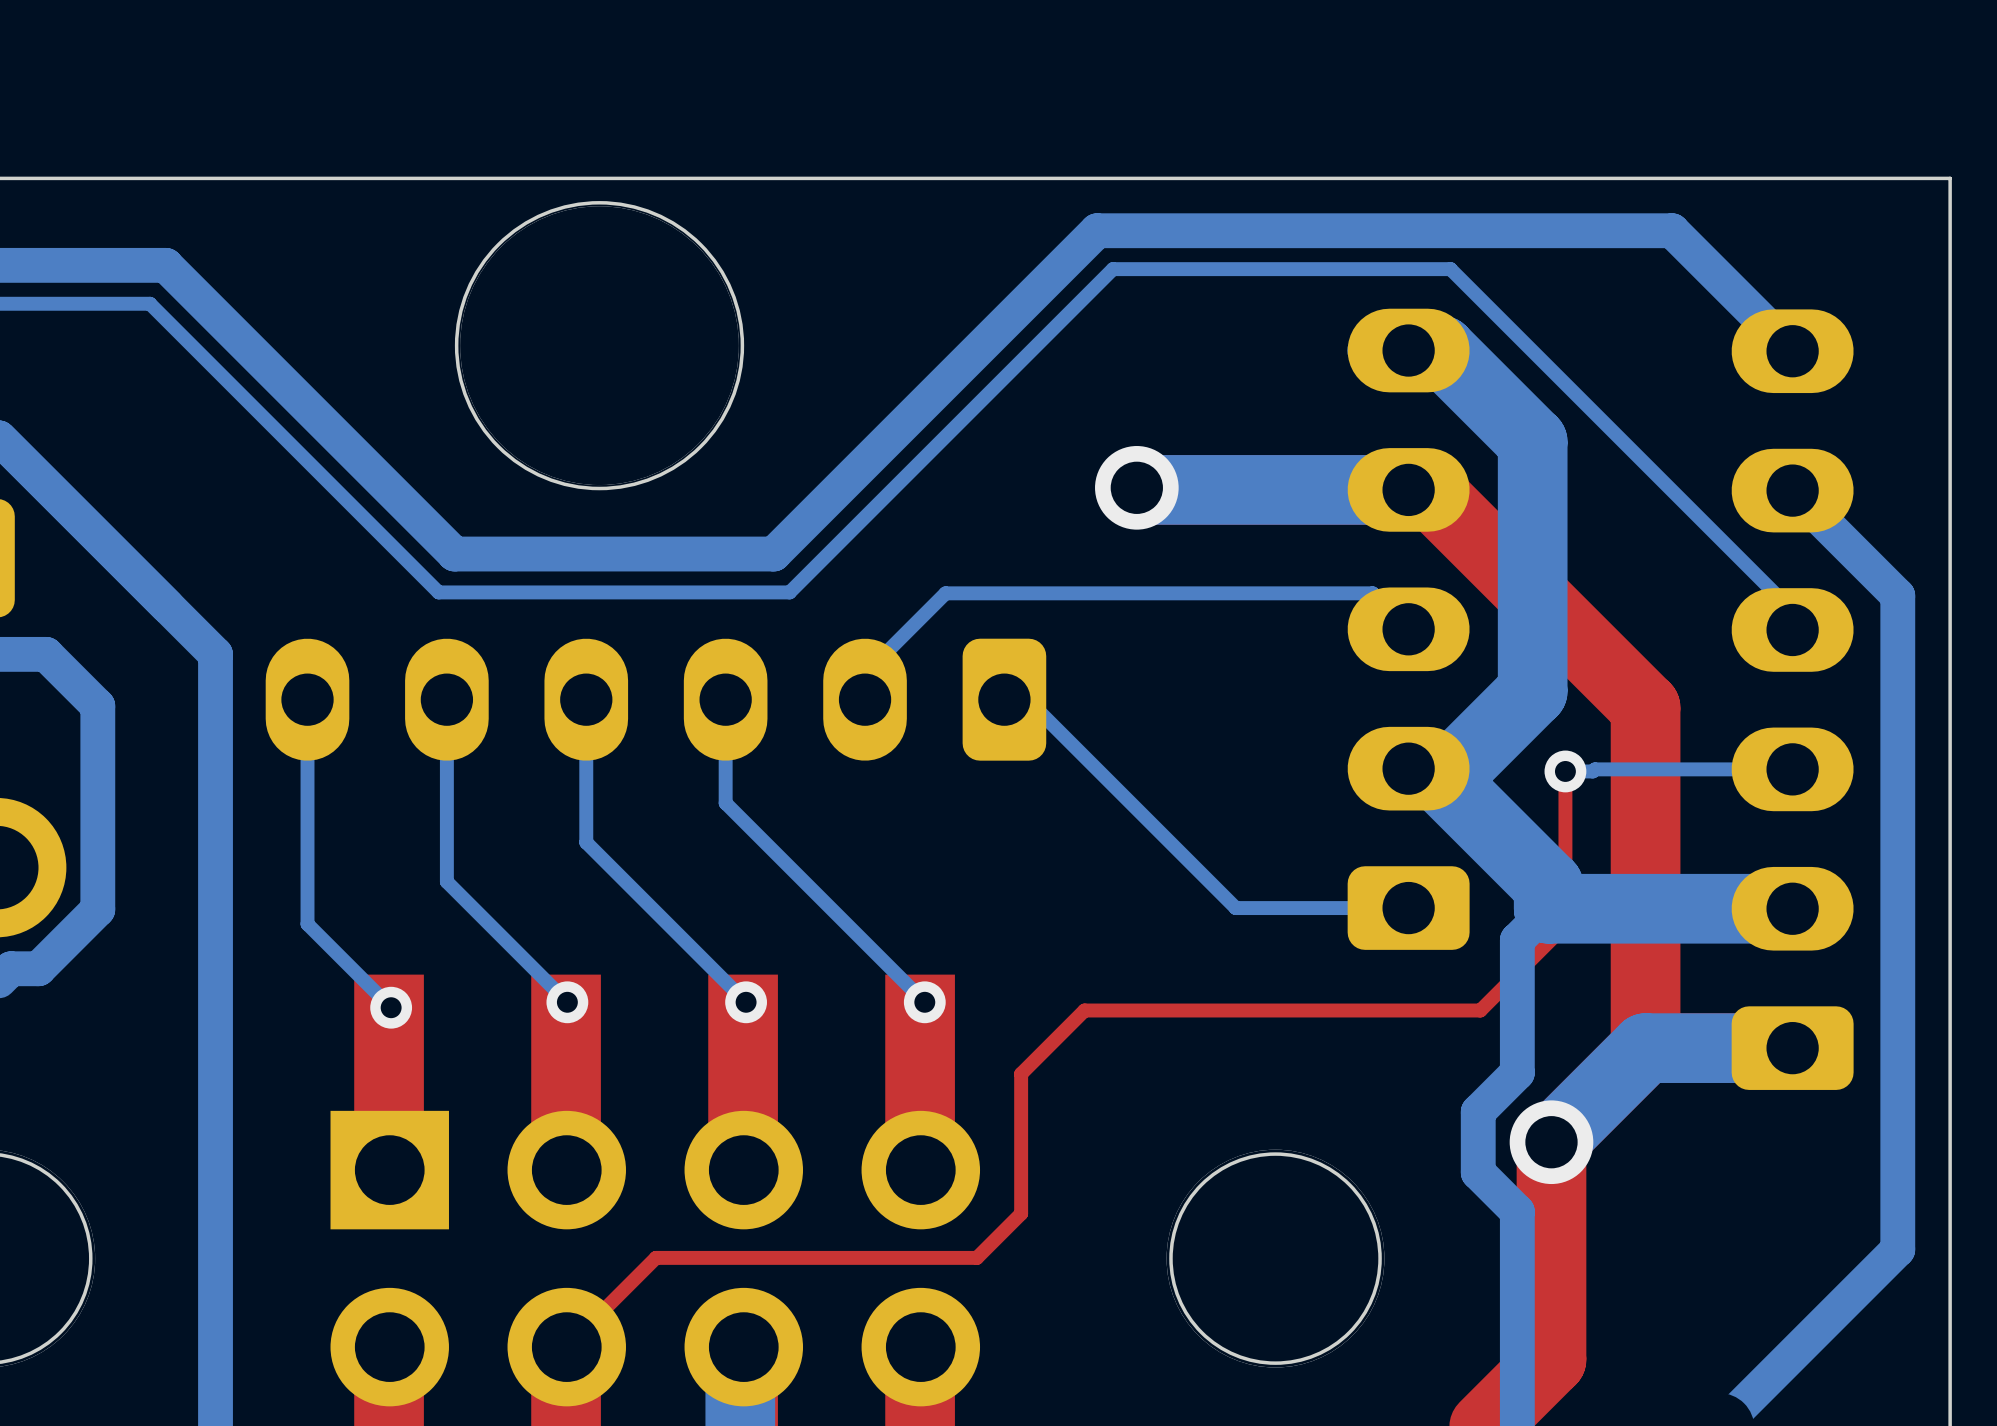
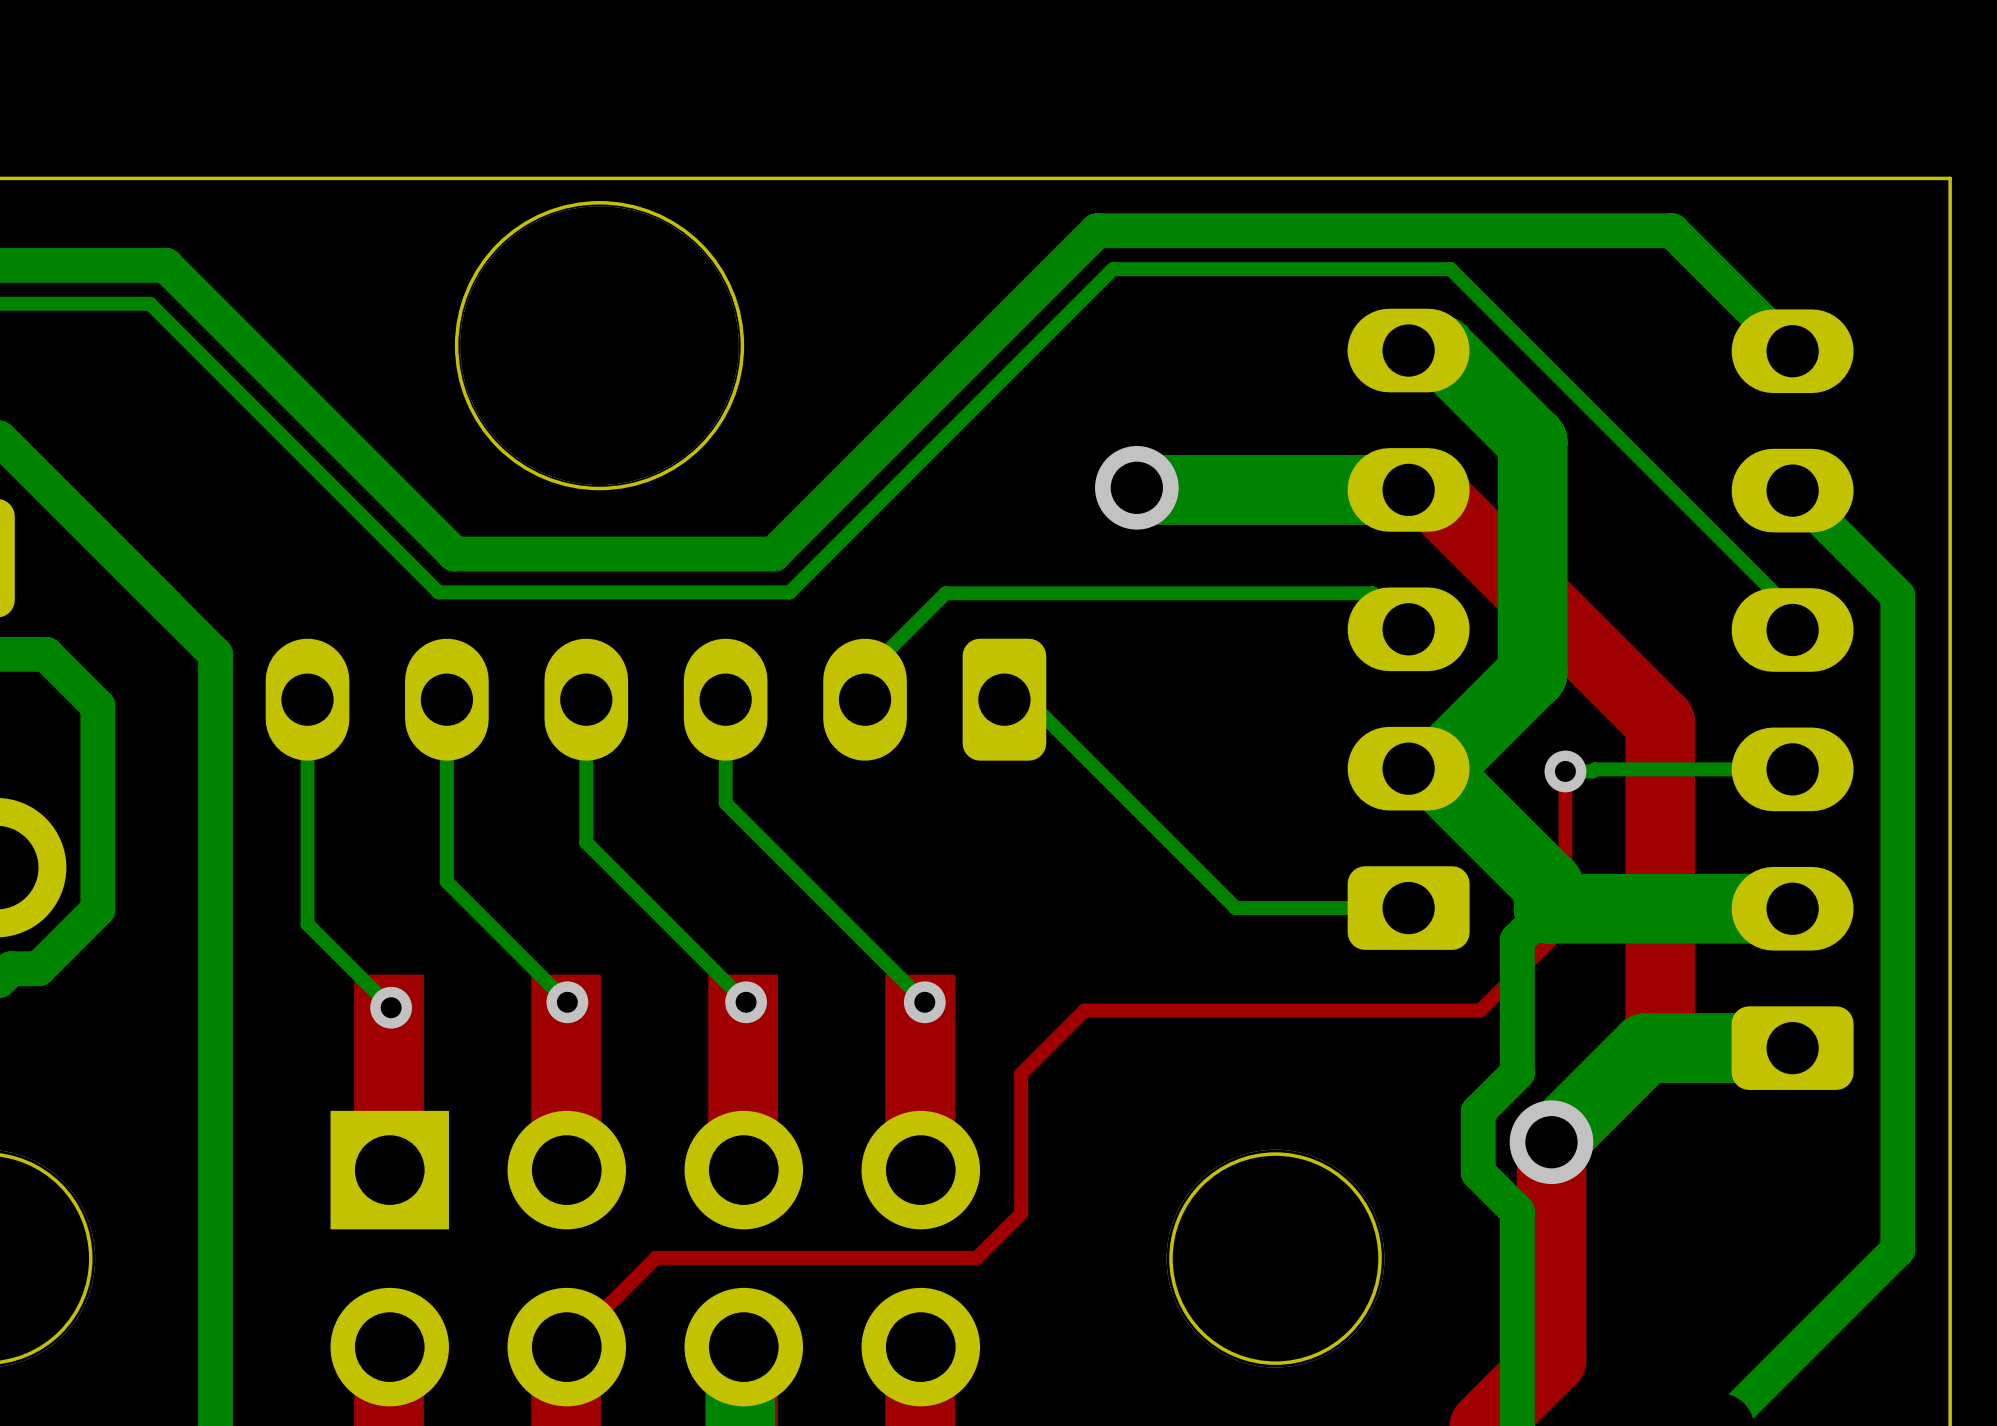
bottom track: (1532, 673) (1532, 691) (1455, 768) (1437, 768) -> (1532, 673) (1437, 768)
top track: (1645, 707) (1645, 1048) -> (1645, 707) (1660, 722) (1660, 1033) (1645, 1048)

